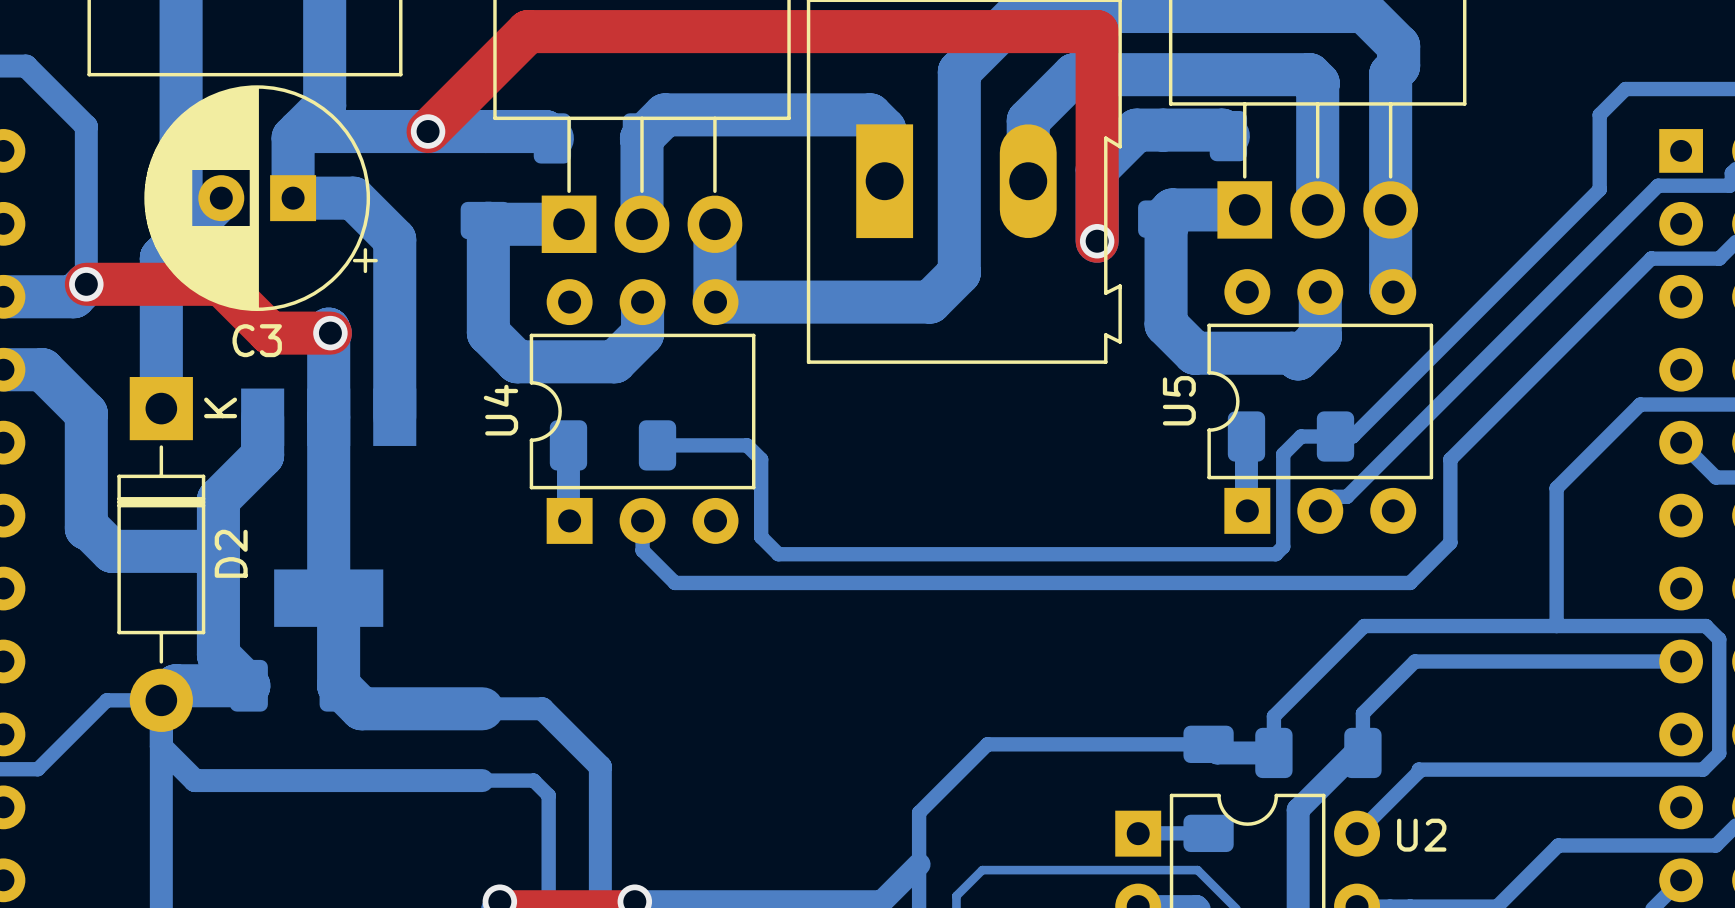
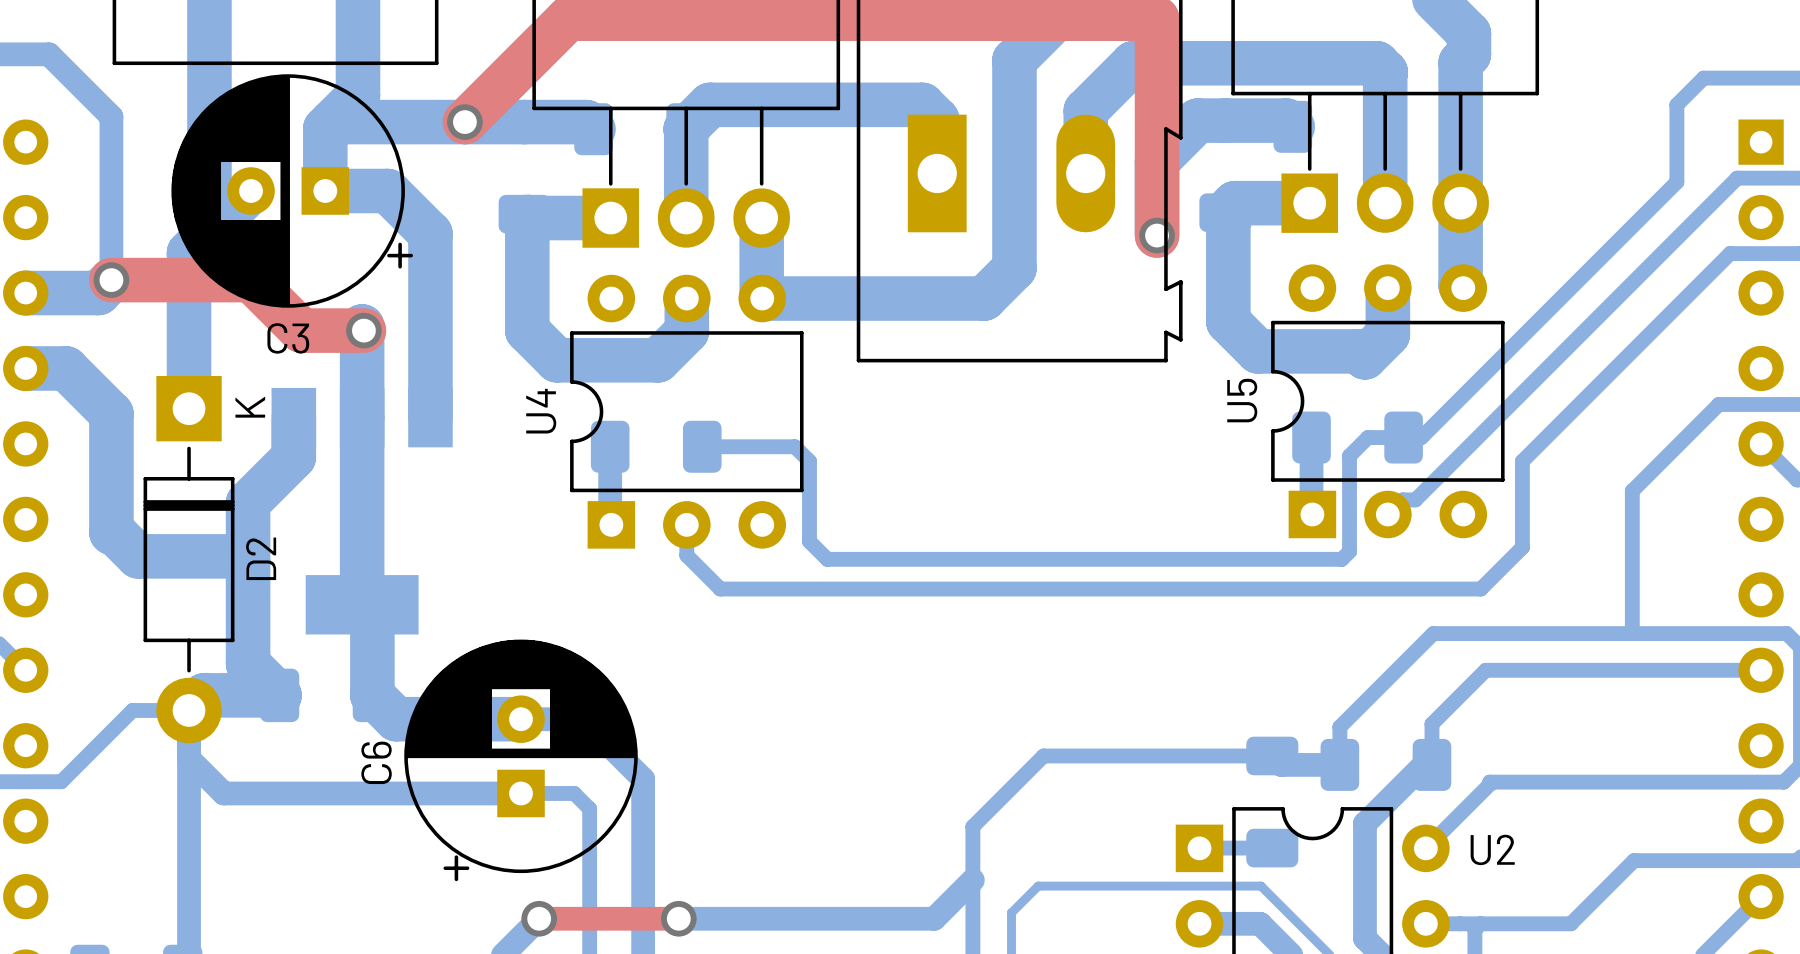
C6: none -> (521, 760)

